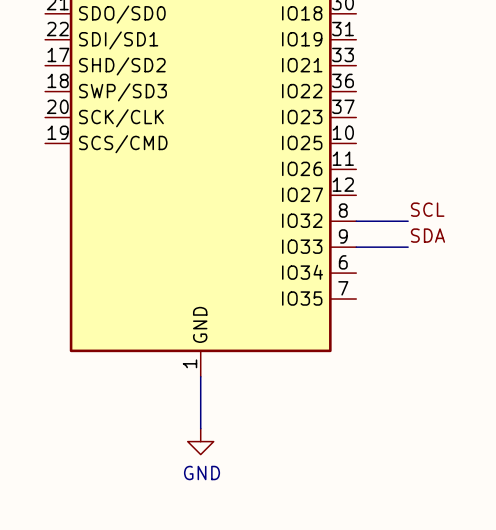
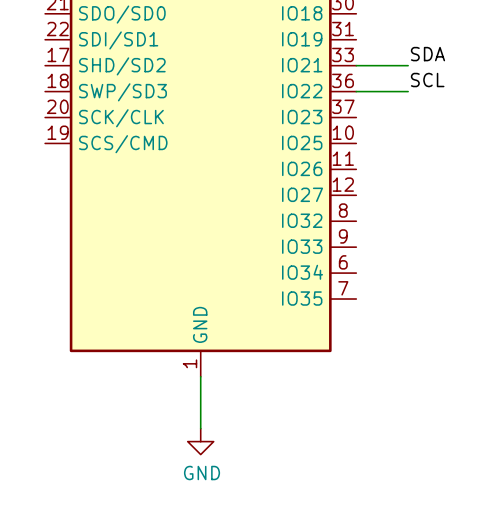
label position: SCL (427, 209) -> SCL (427, 80)
wire: (356, 221) (408, 221) -> (356, 65) (408, 65)
label position: SDA (427, 235) -> SDA (427, 54)
wire: (356, 247) (408, 247) -> (356, 91) (408, 91)

